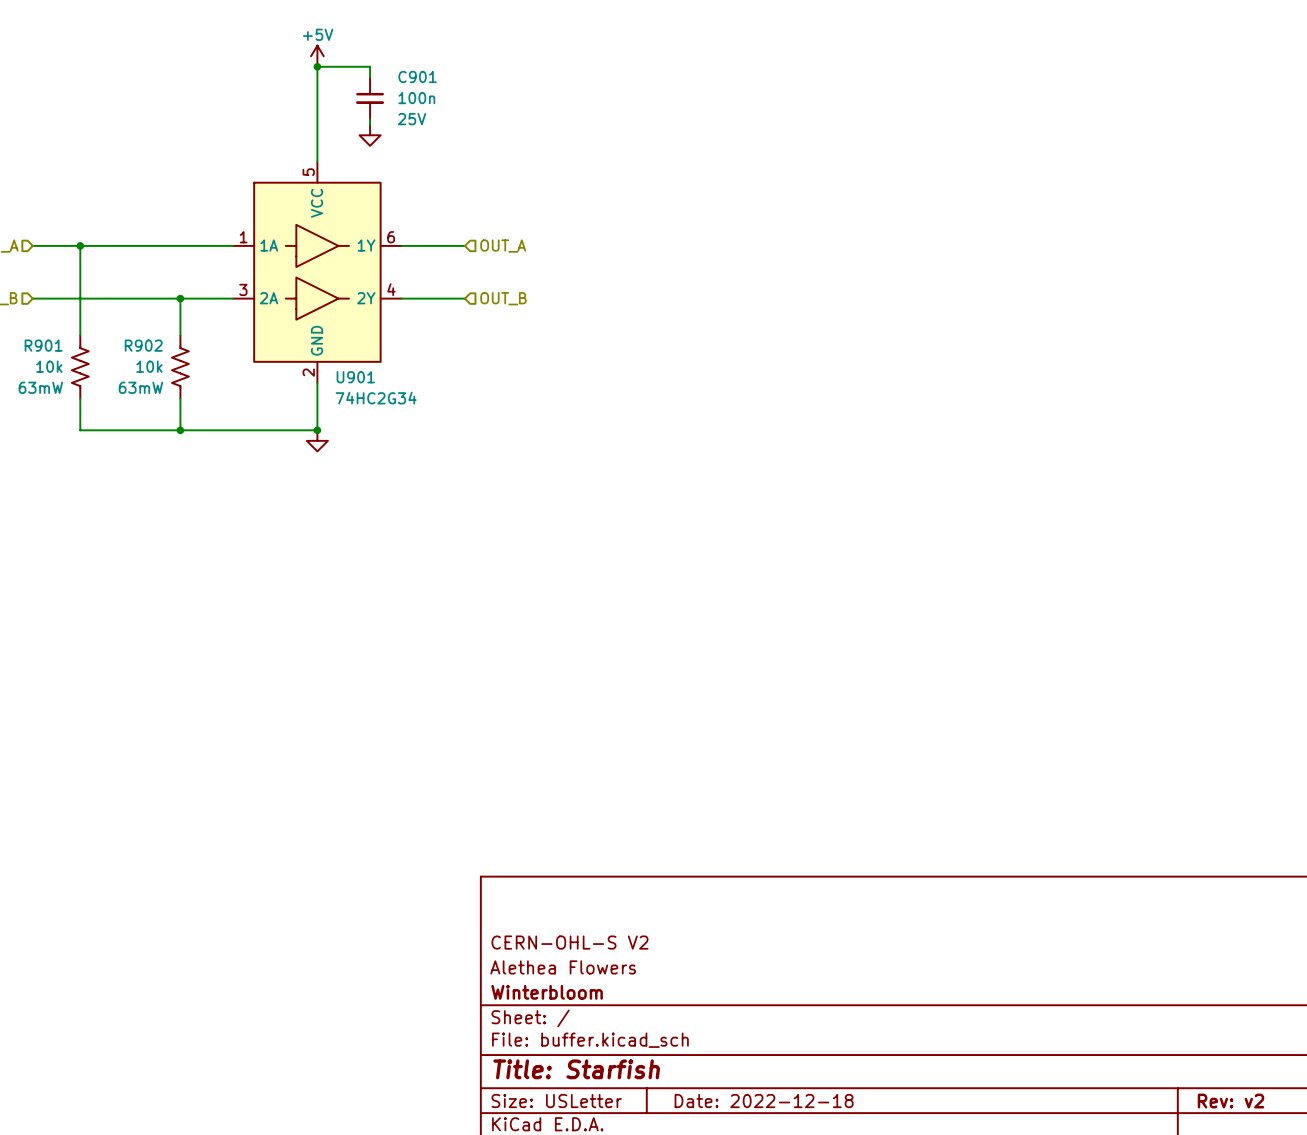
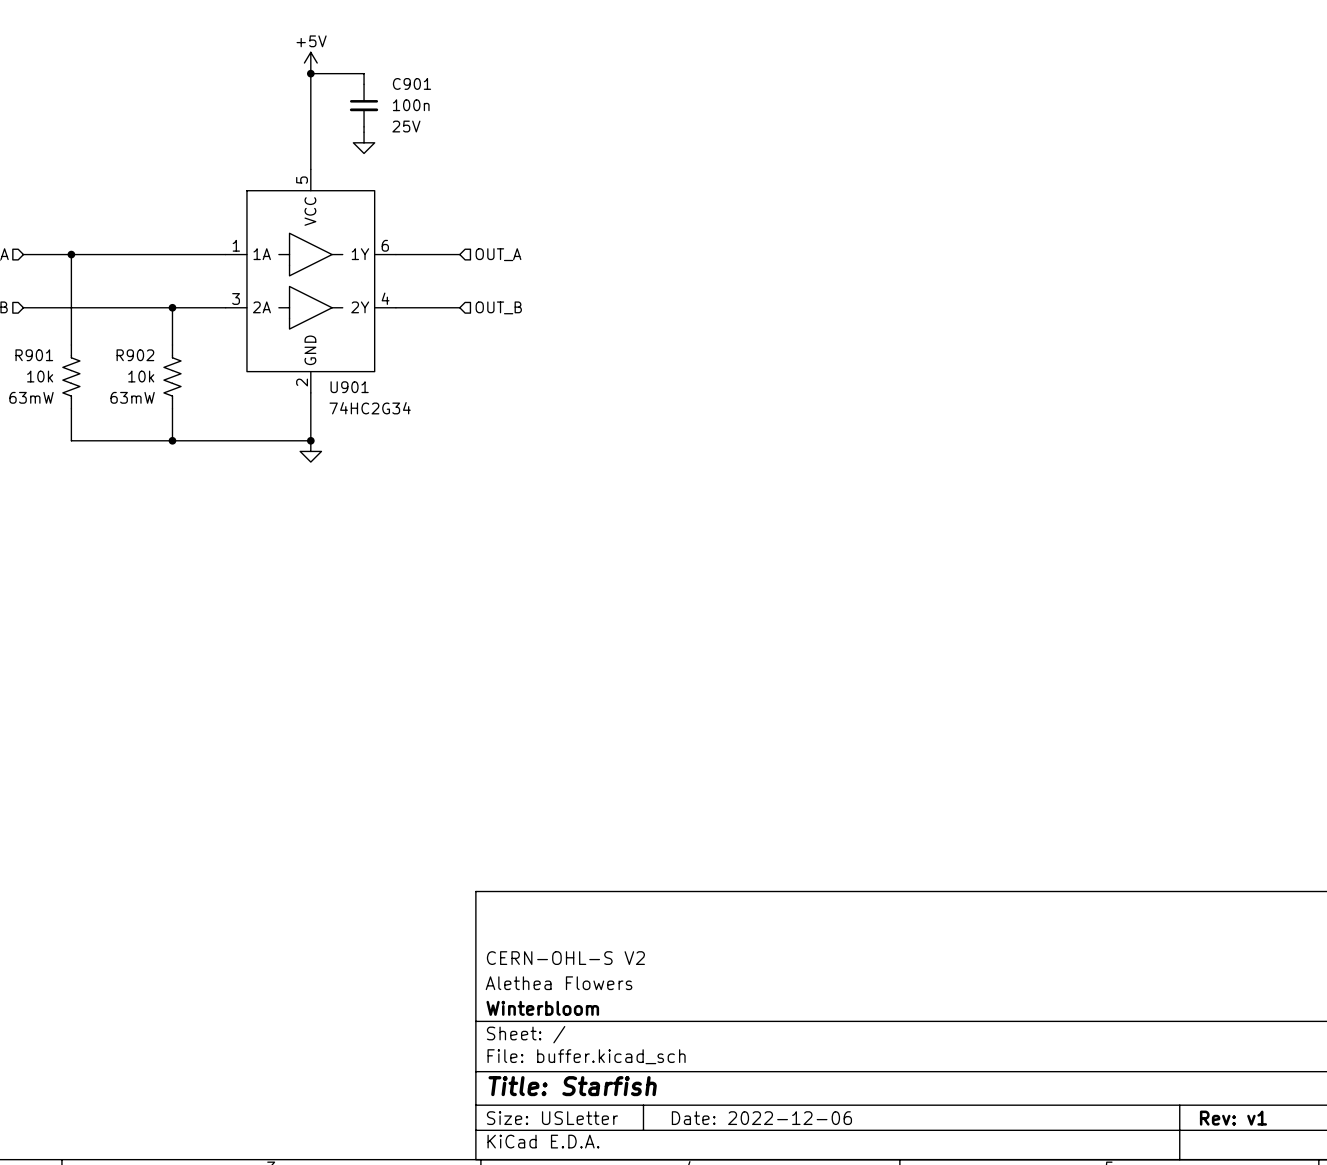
title block: Date: 2022-12-18 (764, 1101) -> Date: 2022-12-06 (761, 1118)
title block: Rev: v2 (1231, 1101) -> Rev: v1 (1233, 1118)

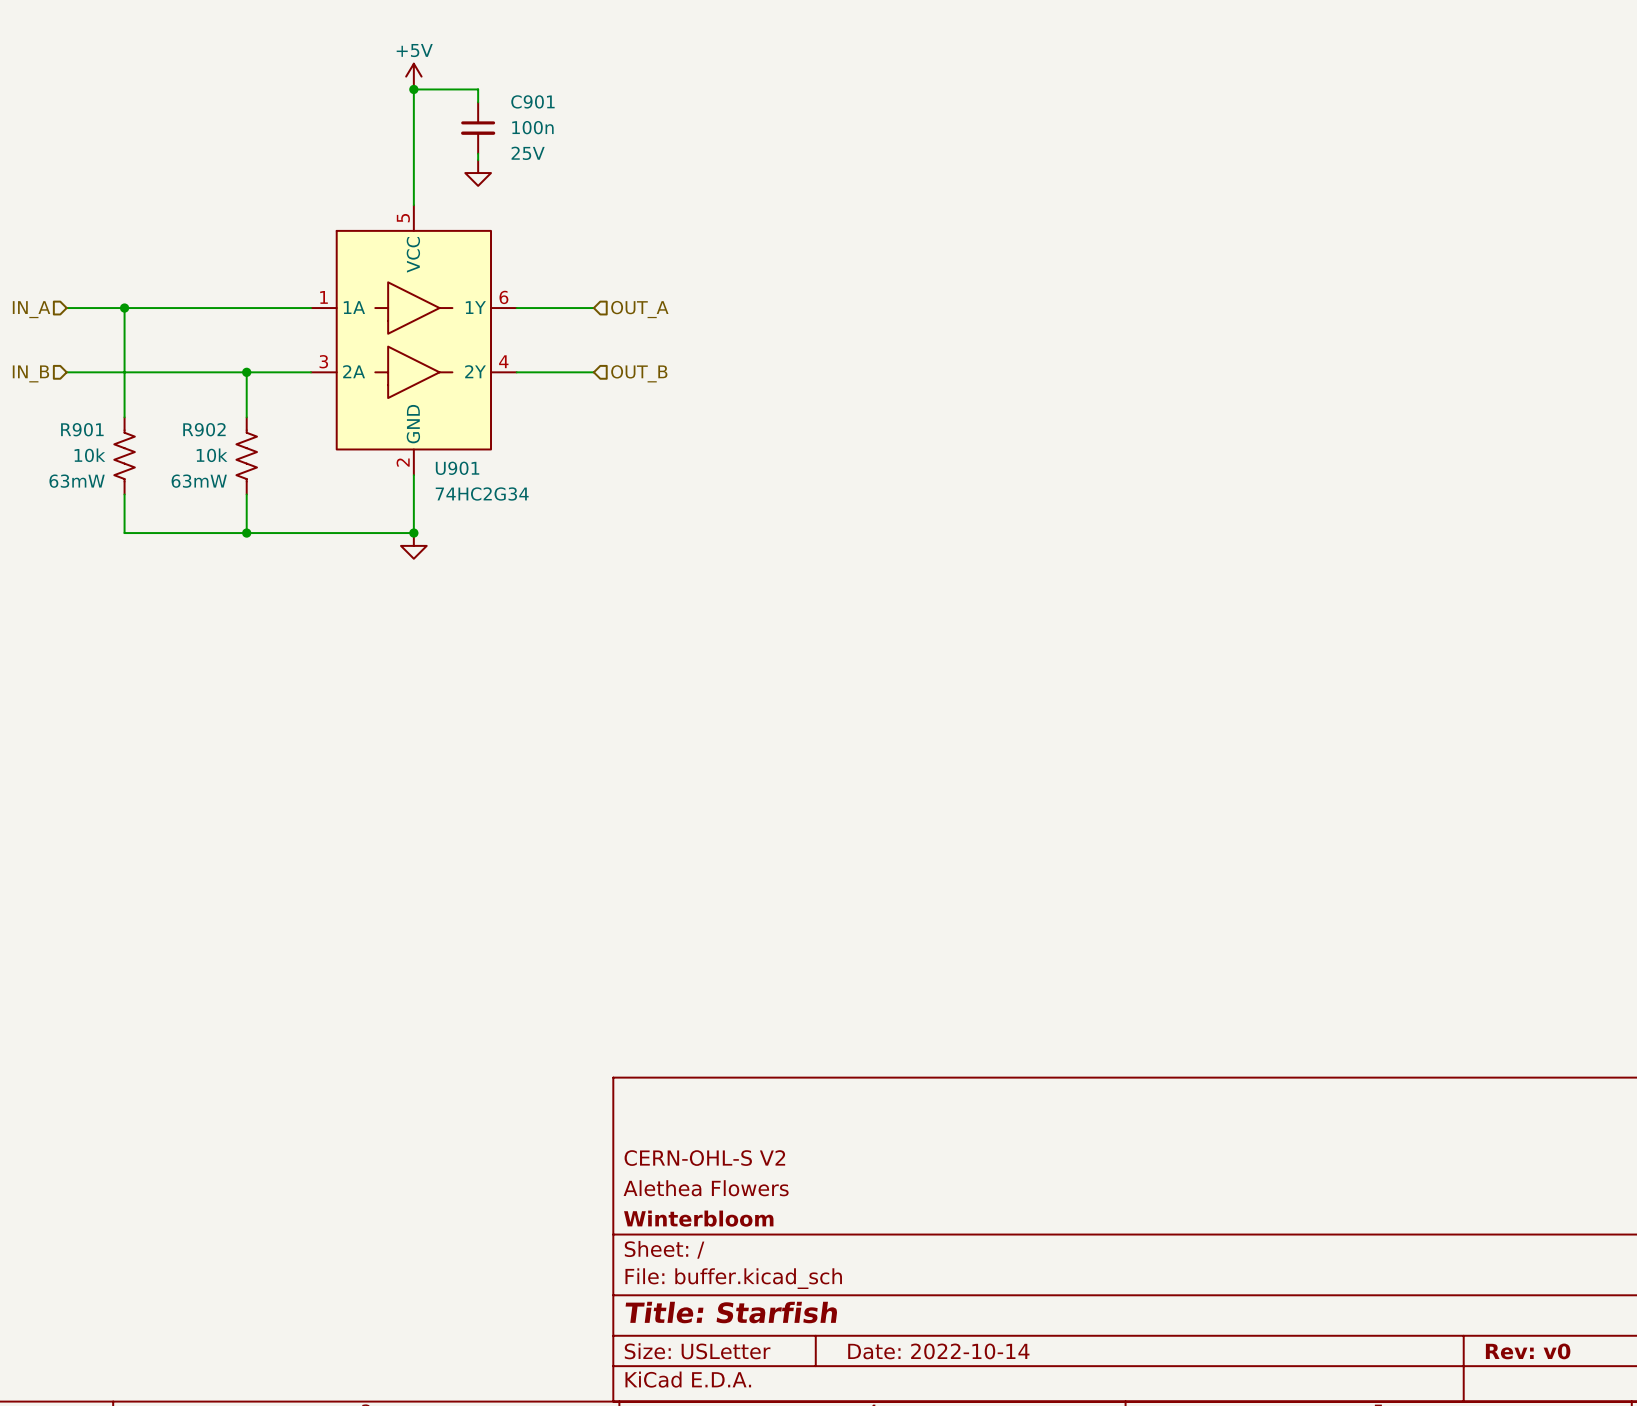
title block: Date: 2022-12-06 (761, 1118) -> Date: 2022-10-14 (938, 1351)
title block: Rev: v1 (1233, 1118) -> Rev: v0 (1528, 1351)

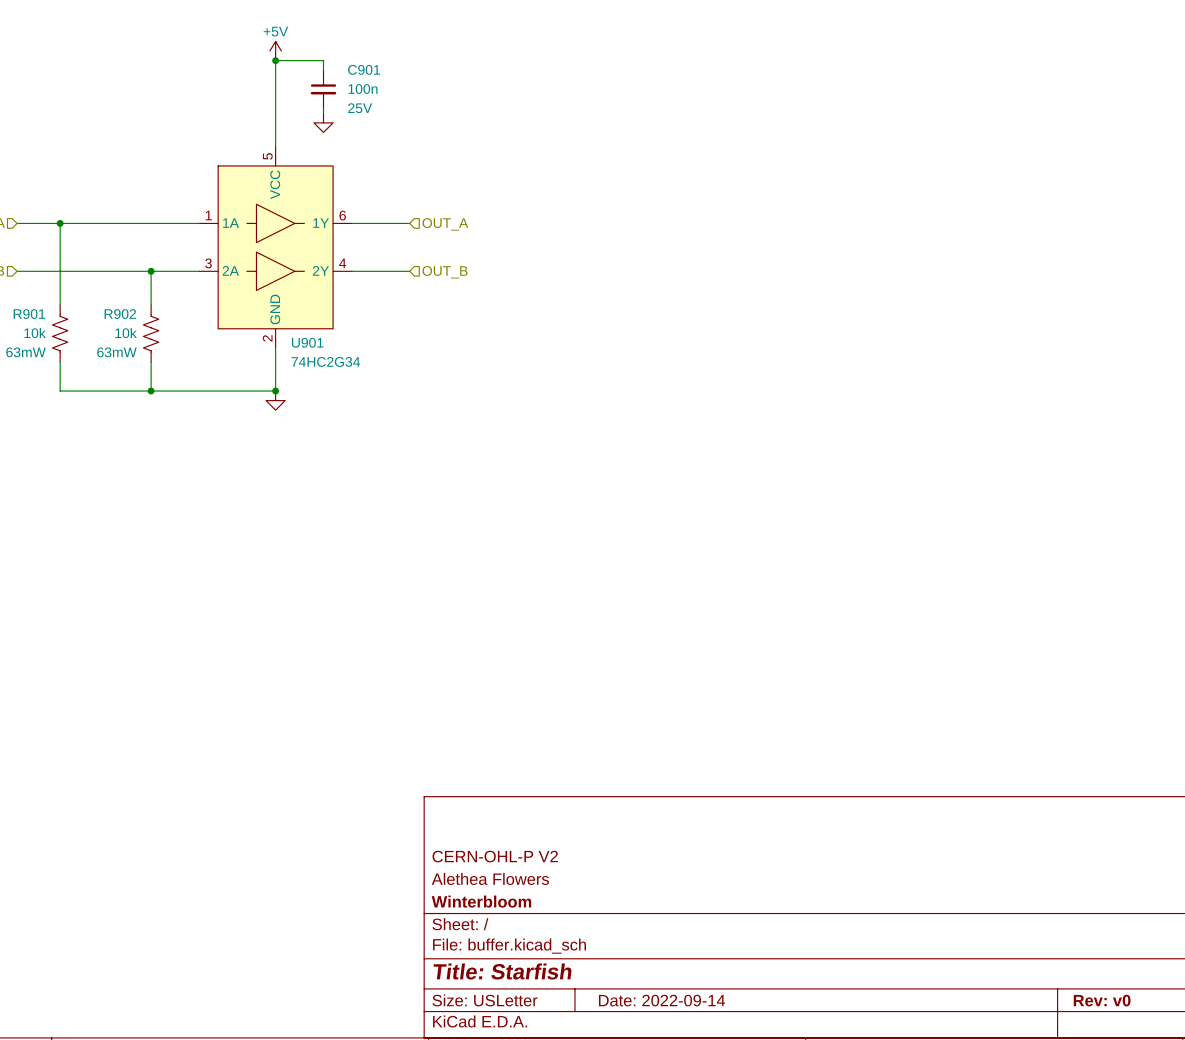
title block: CERN-OHL-S V2 (704, 1158) -> CERN-OHL-P V2 (495, 856)
title block: Date: 2022-10-14 (938, 1351) -> Date: 2022-09-14 (662, 1000)

